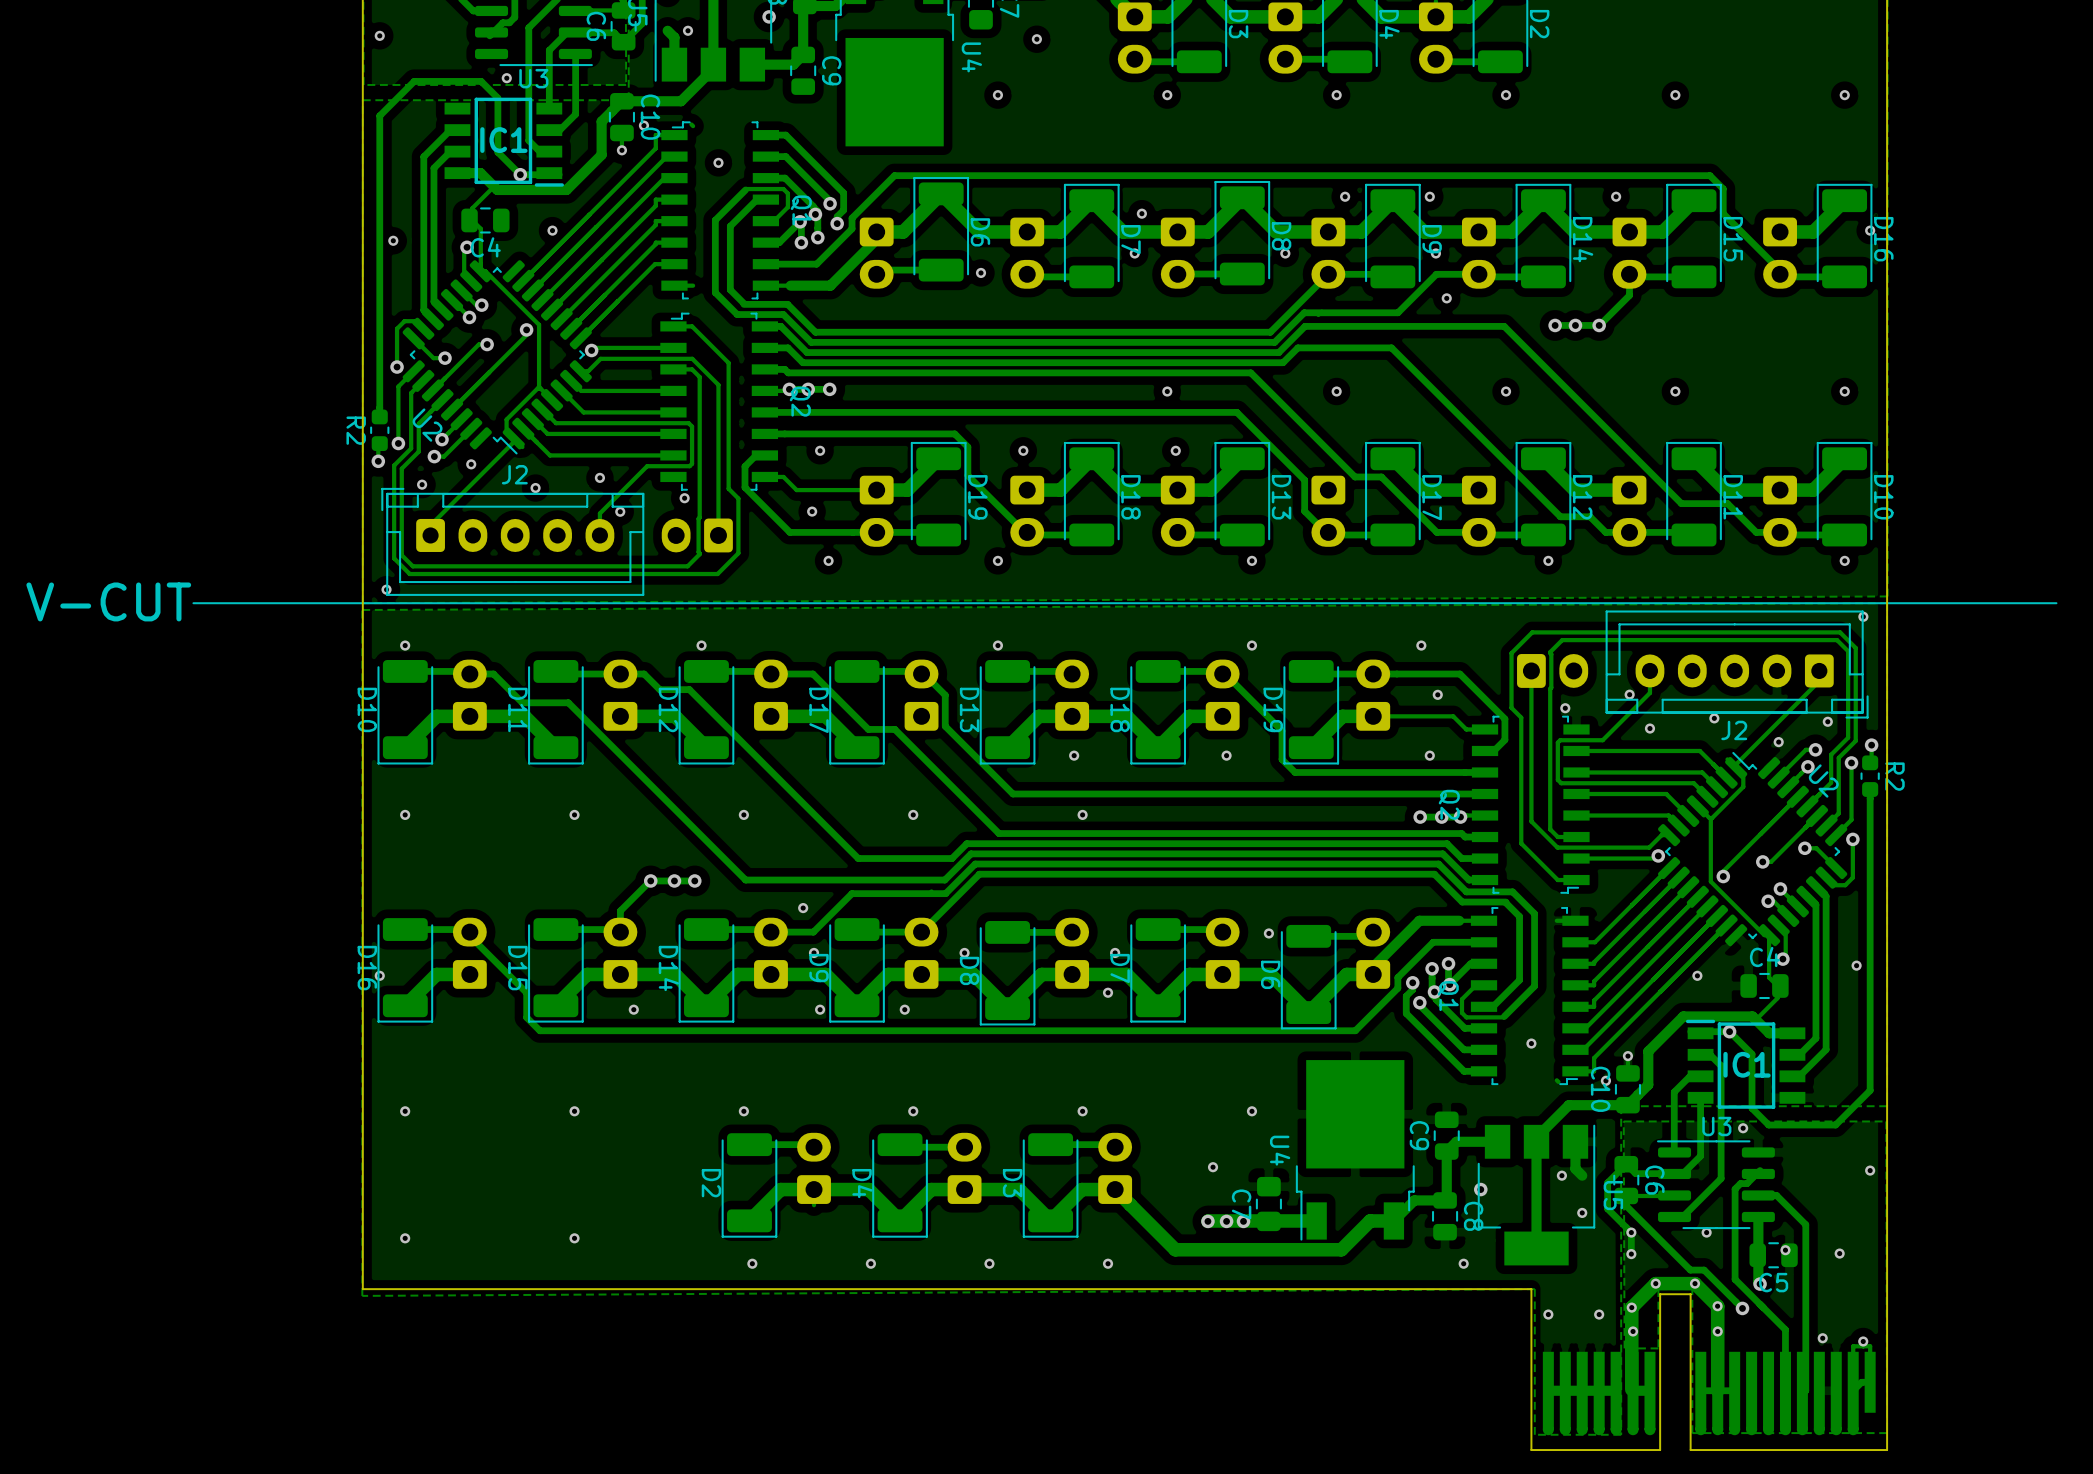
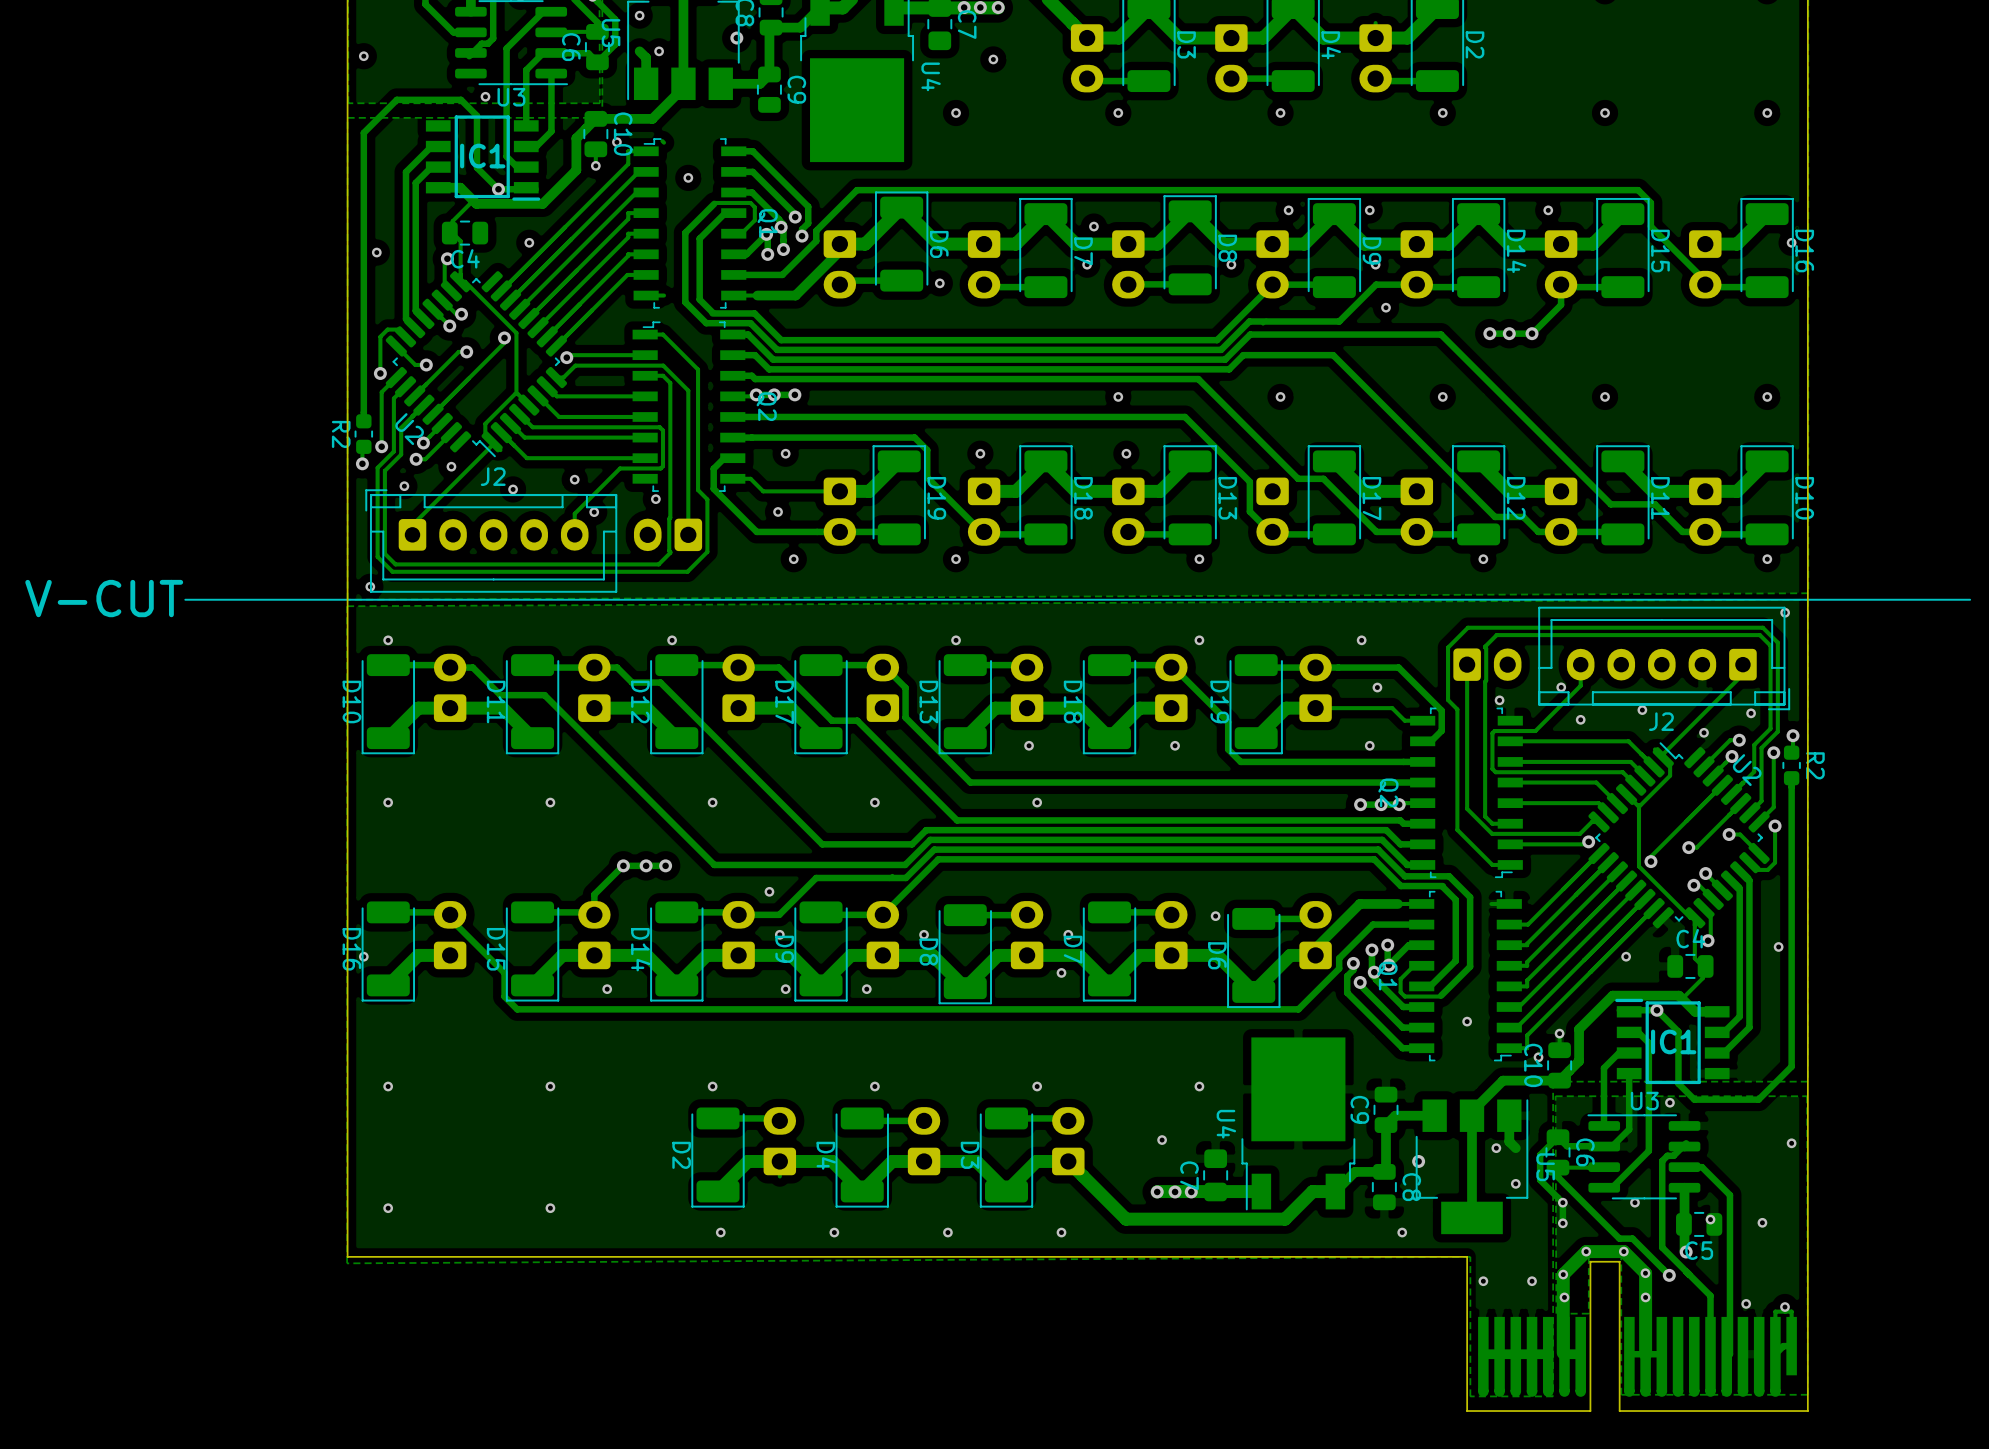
track: (1556, 1080) (1558, 1081) -> none

